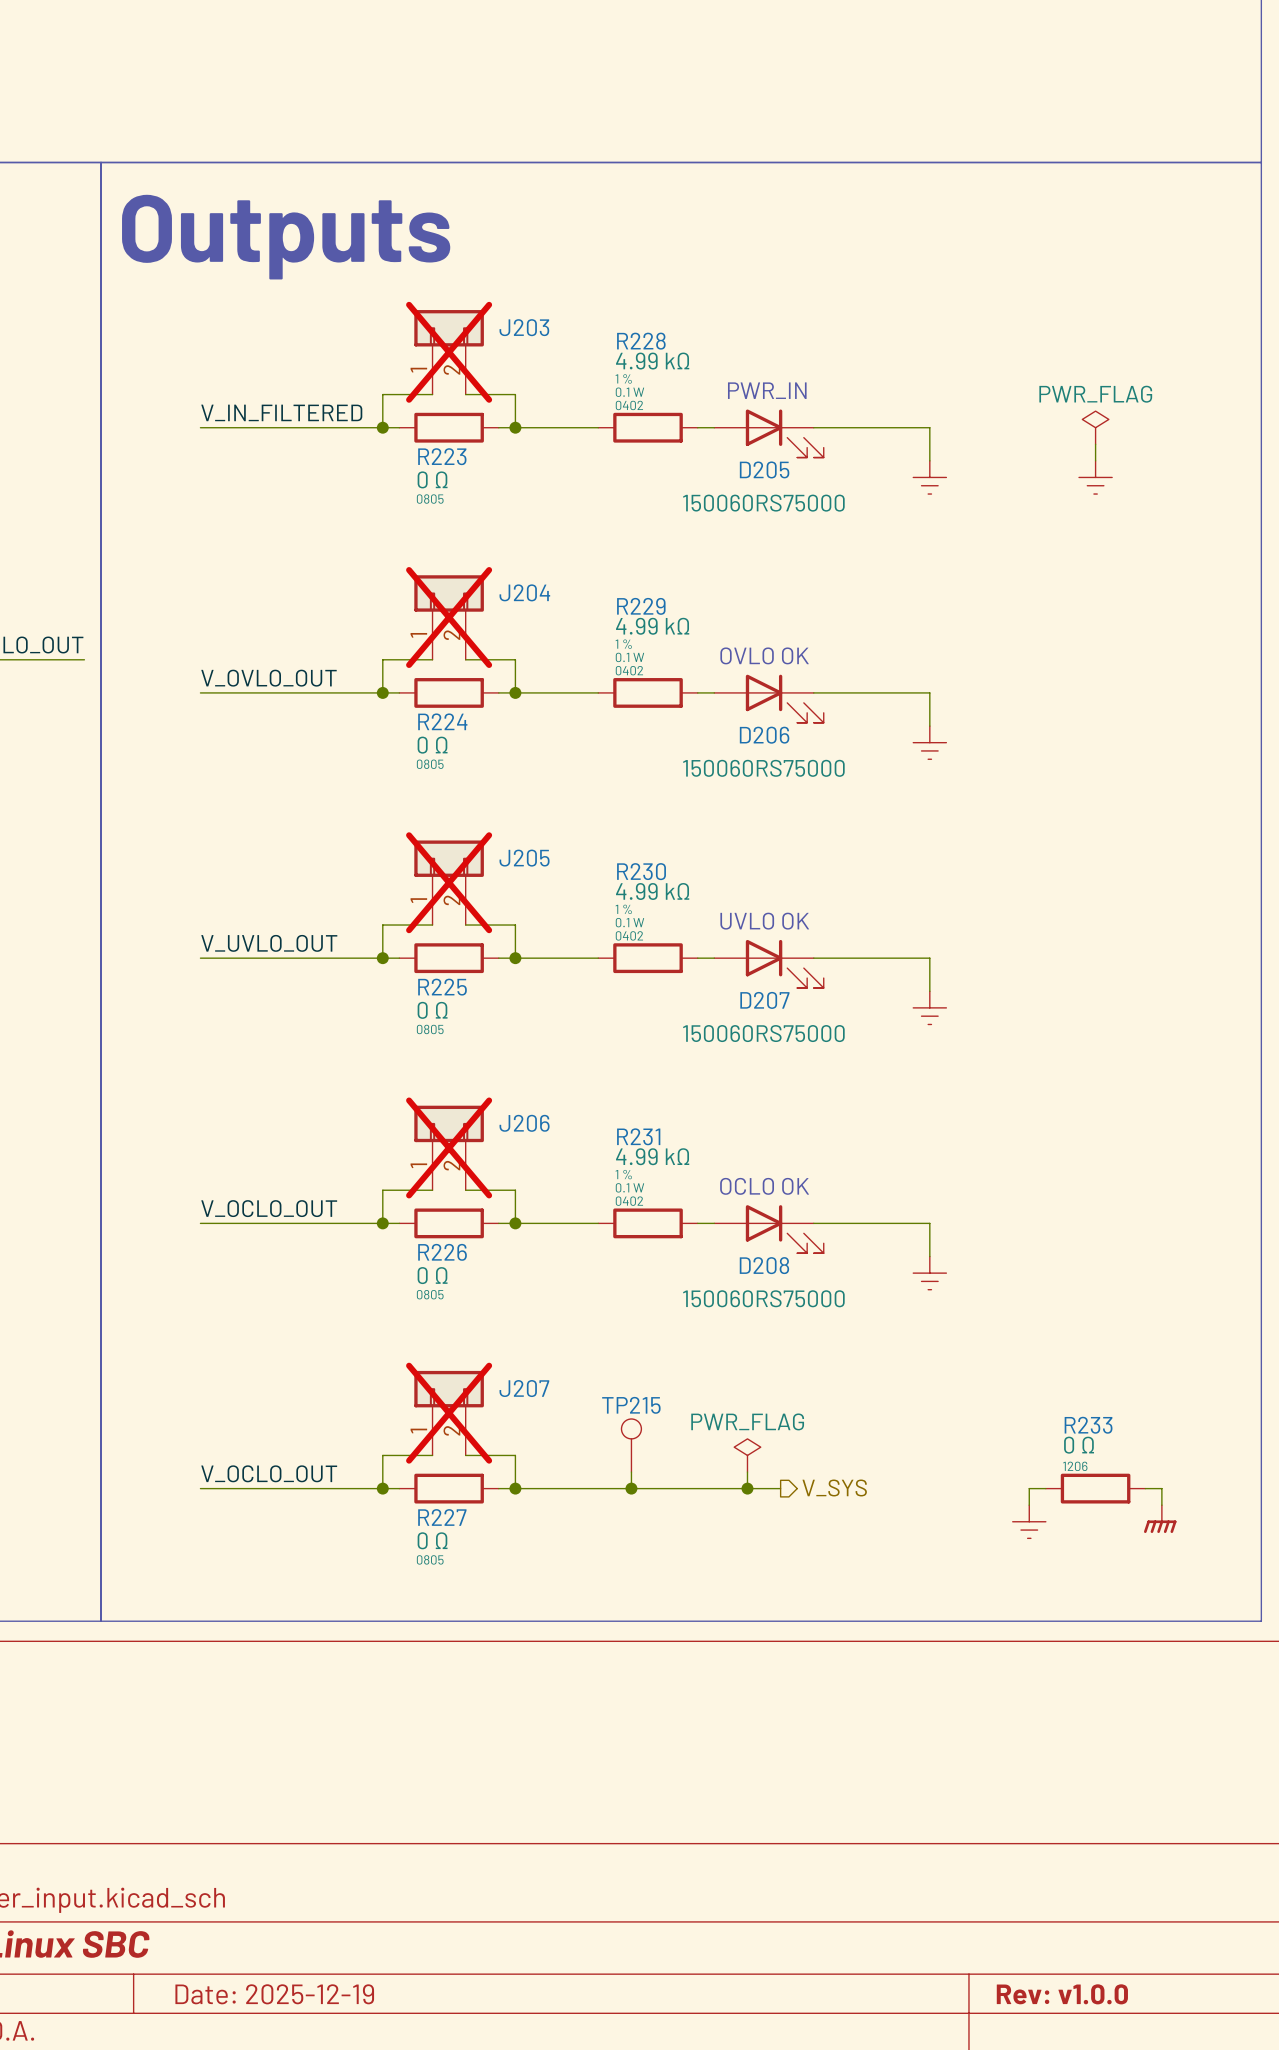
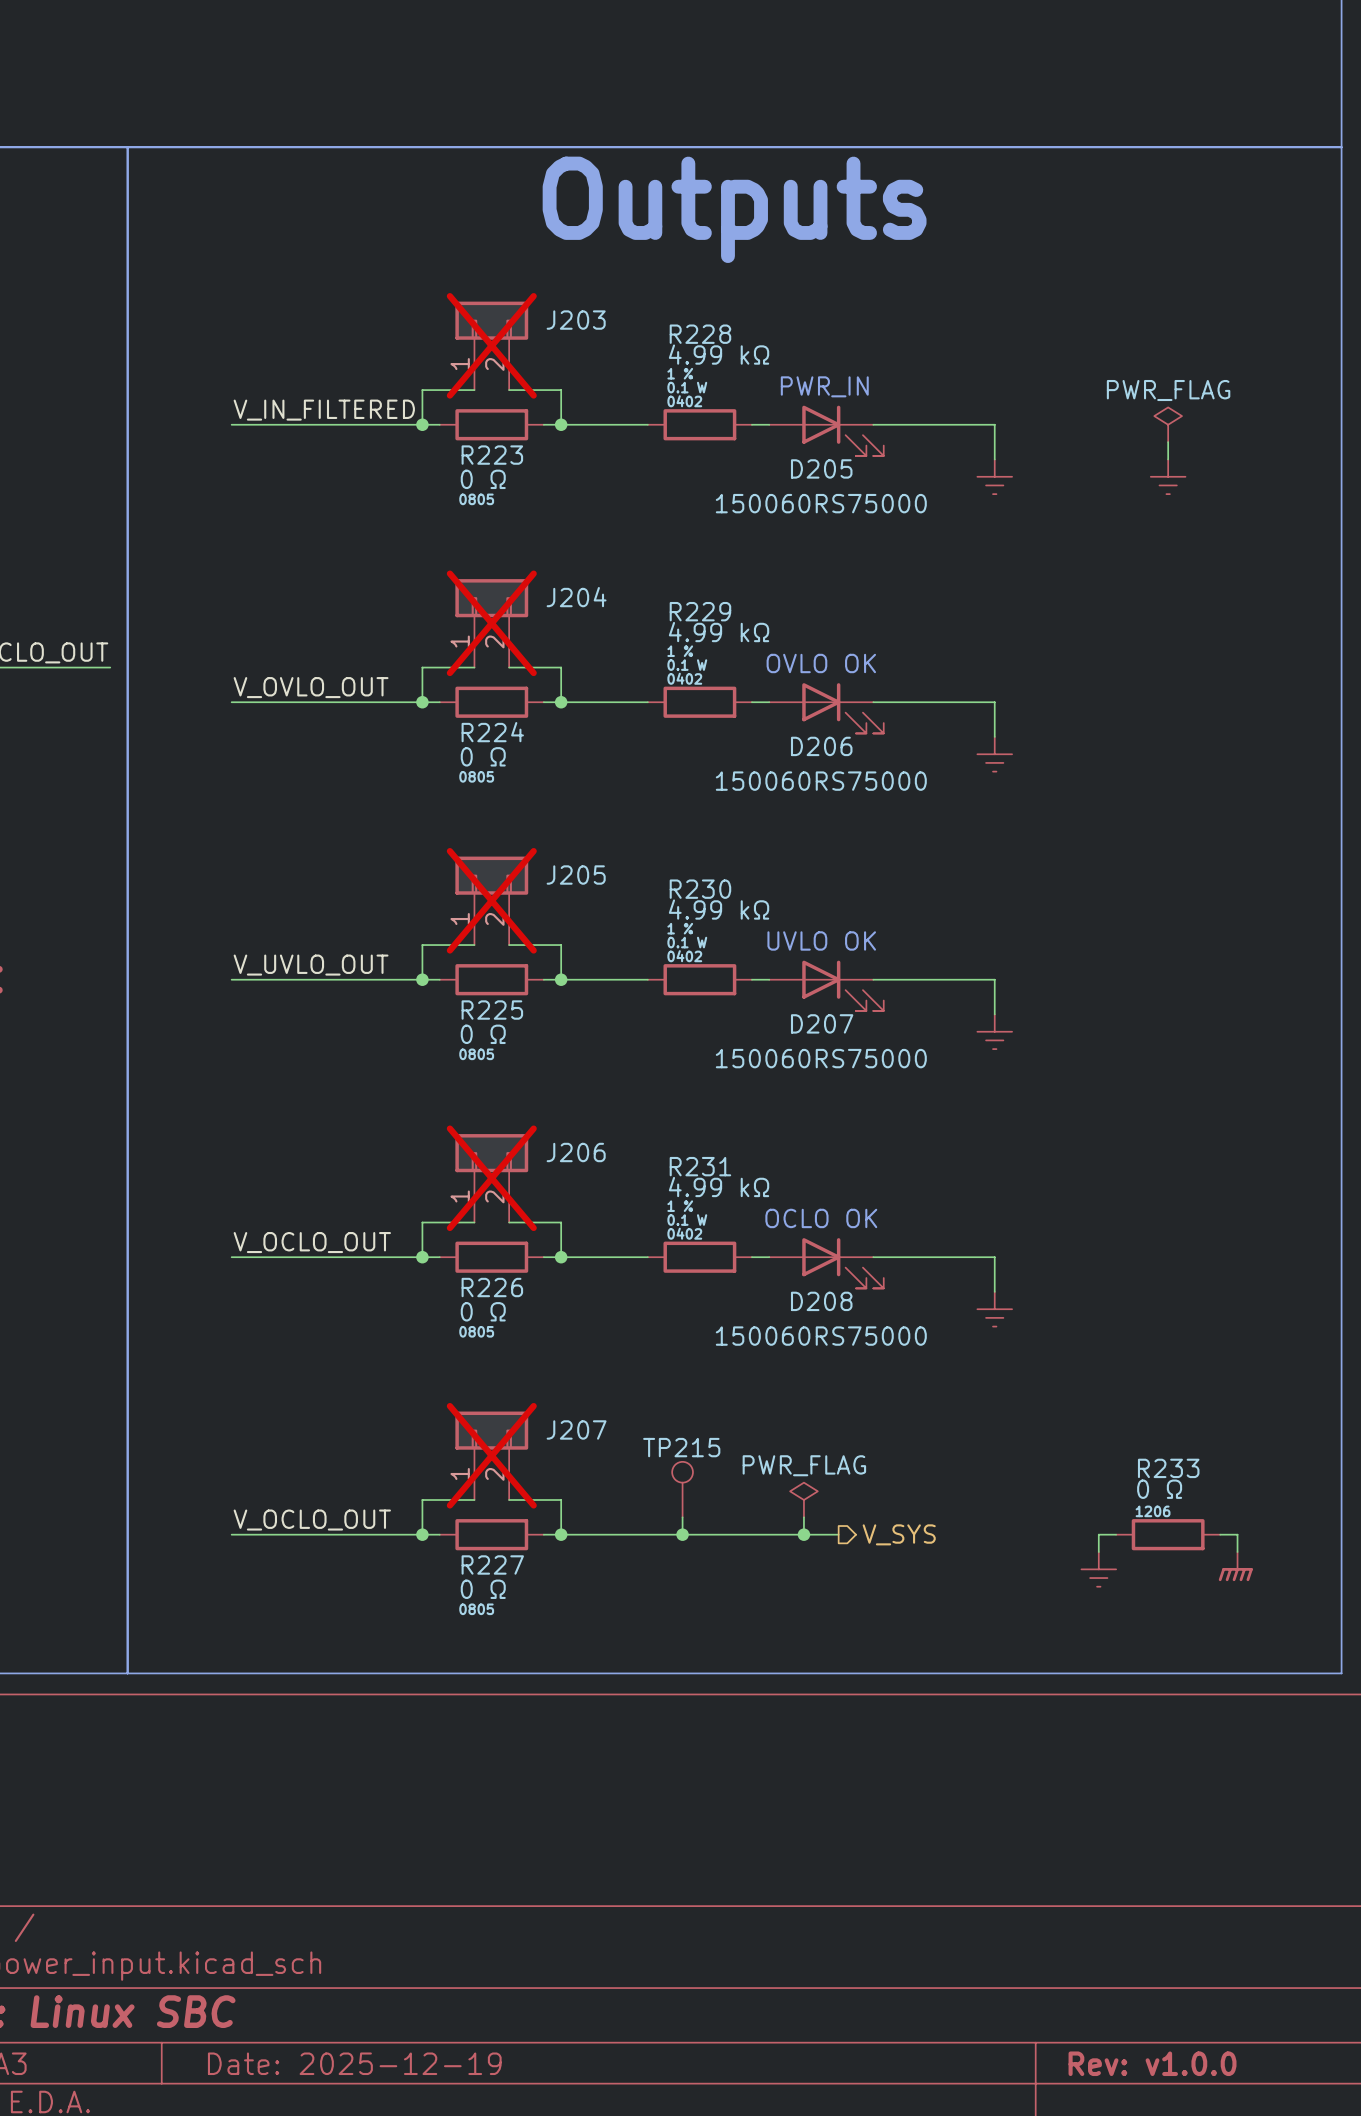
text: none -> Outputs (734, 209)
text: Outputs (286, 237) -> none

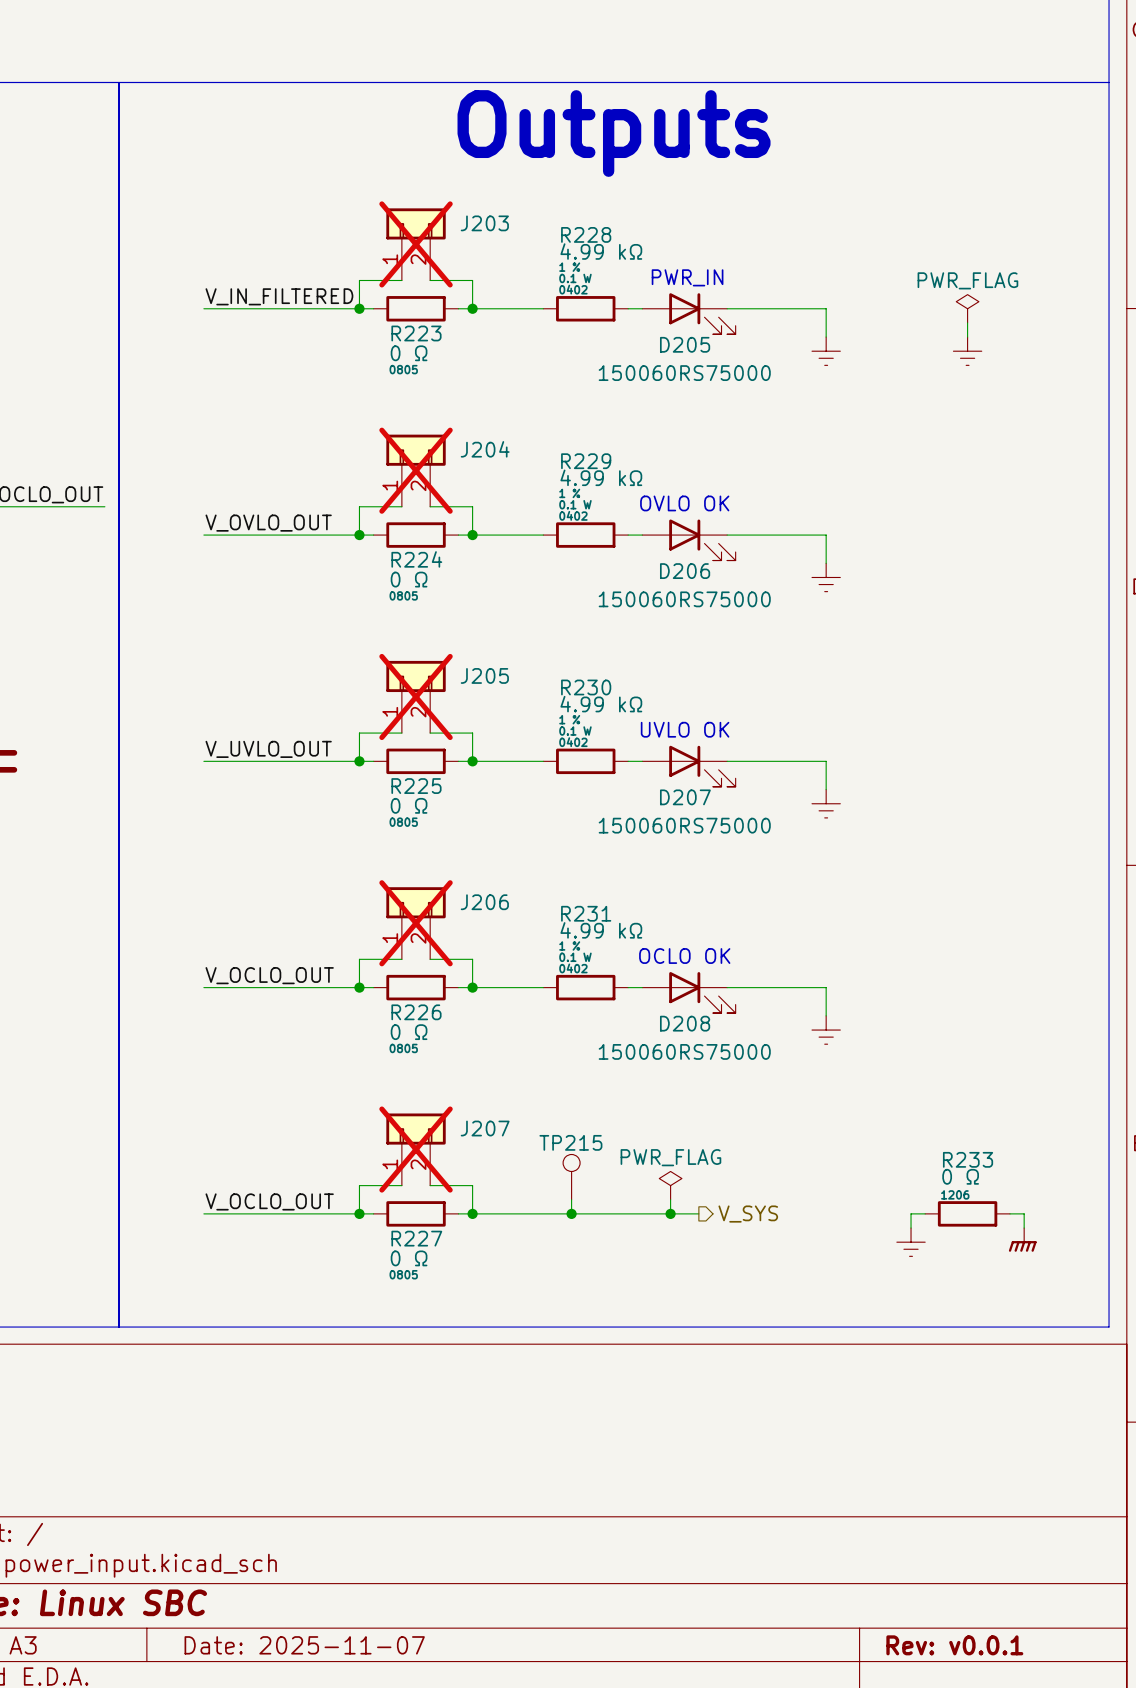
title block: Date: 2025-12-19 (354, 2063) -> Date: 2025-11-07 (304, 1645)
title block: Rev: v1.0.0 (1152, 2063) -> Rev: v0.0.1 (954, 1645)

